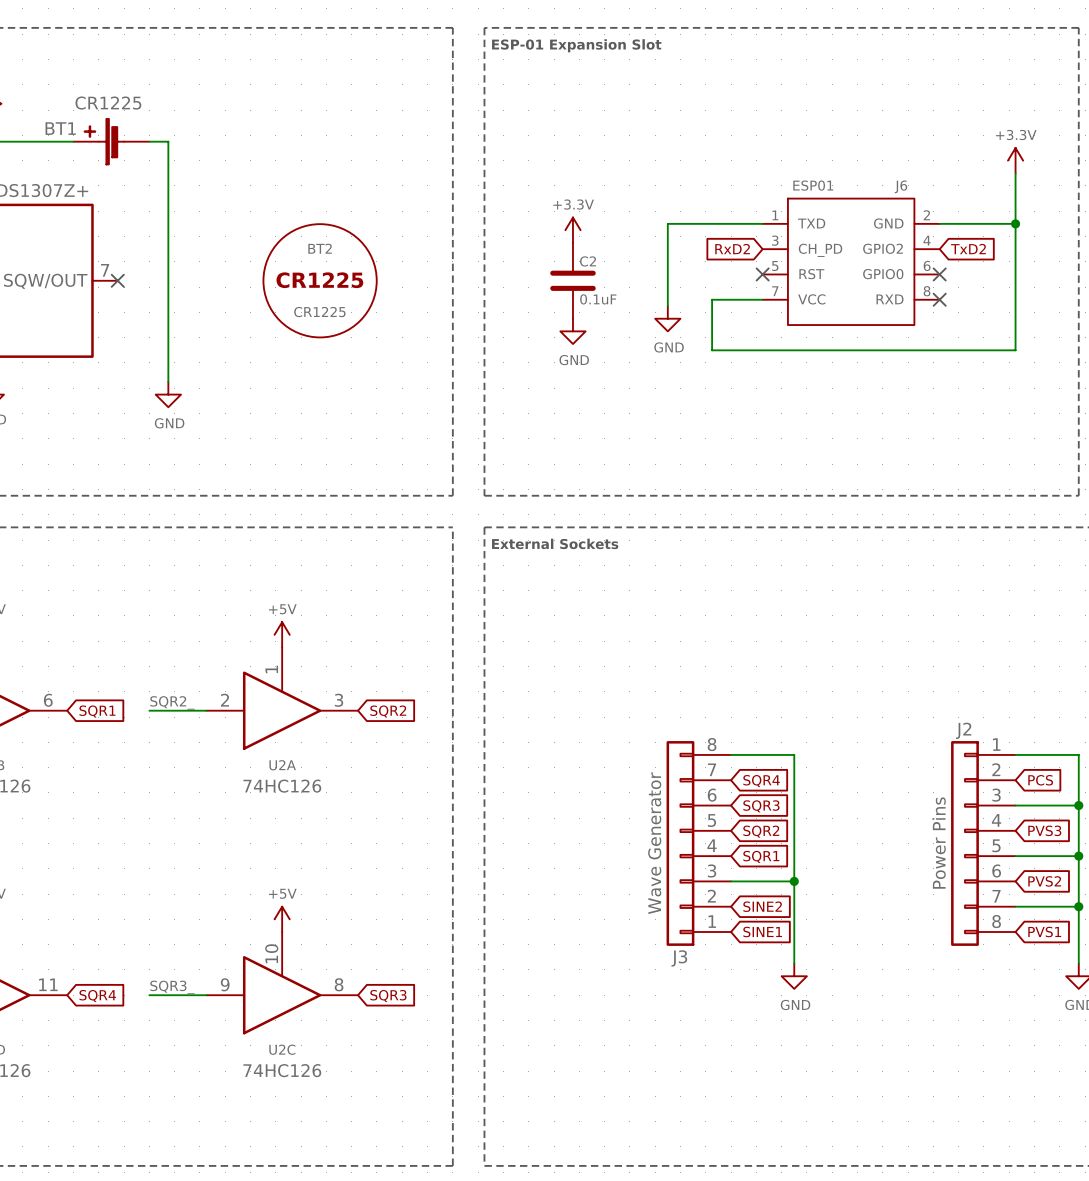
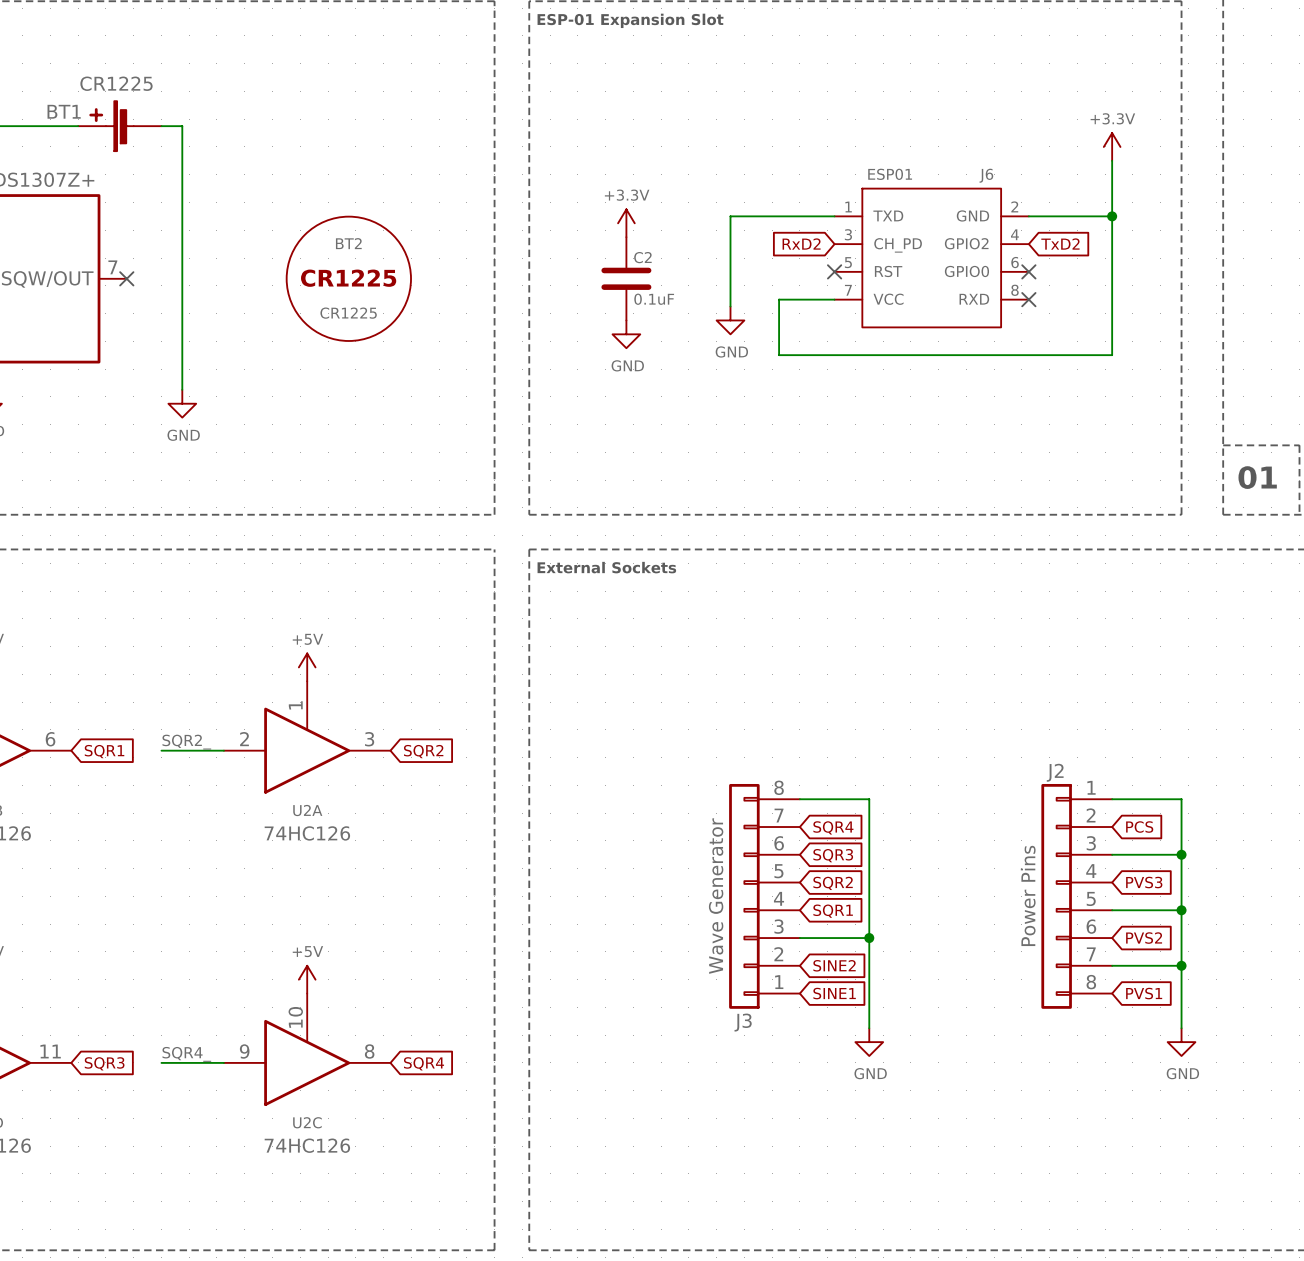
label: SQR3_ (172, 987) -> SQR4_ (186, 1054)
global label: SQR4 (97, 996) -> SQR3 (104, 1063)
global label: SQR3 (388, 996) -> SQR4 (424, 1063)

